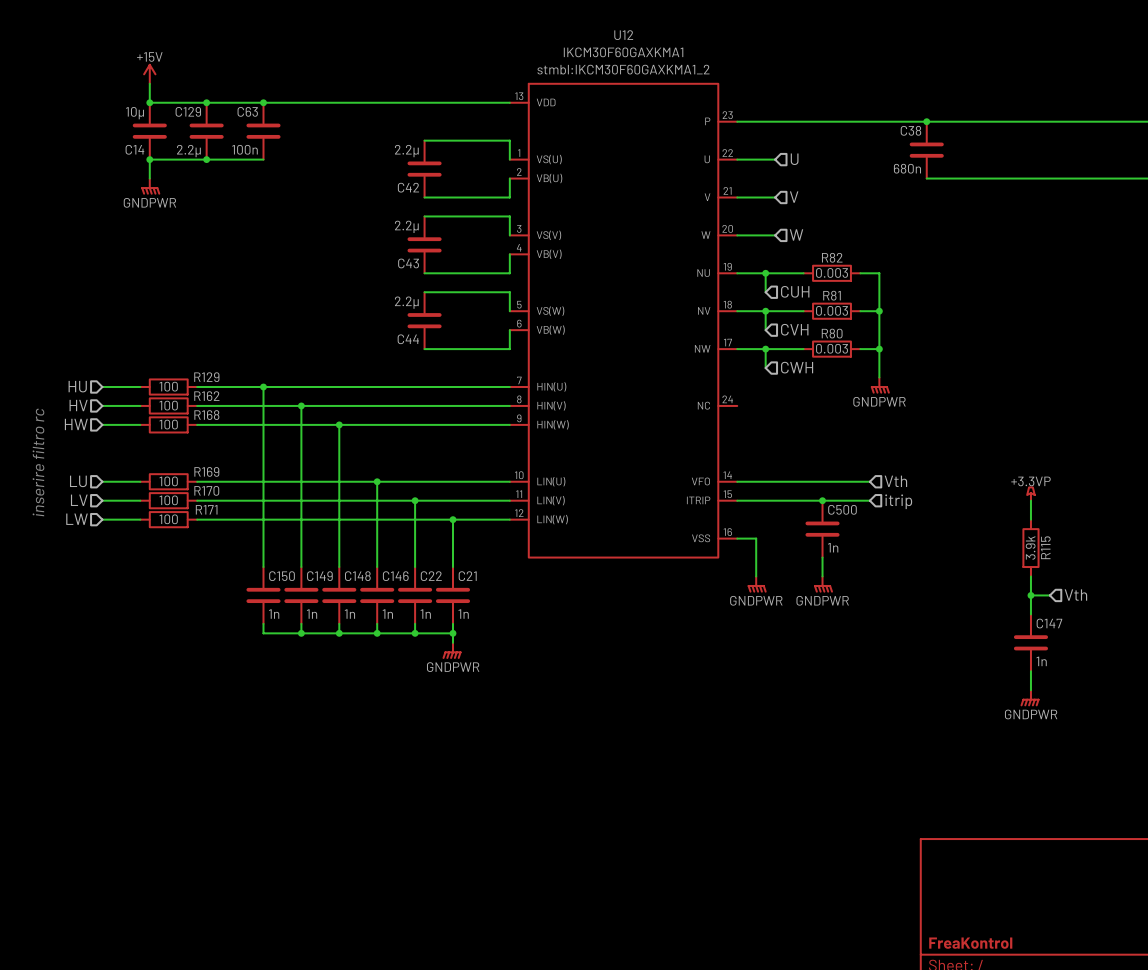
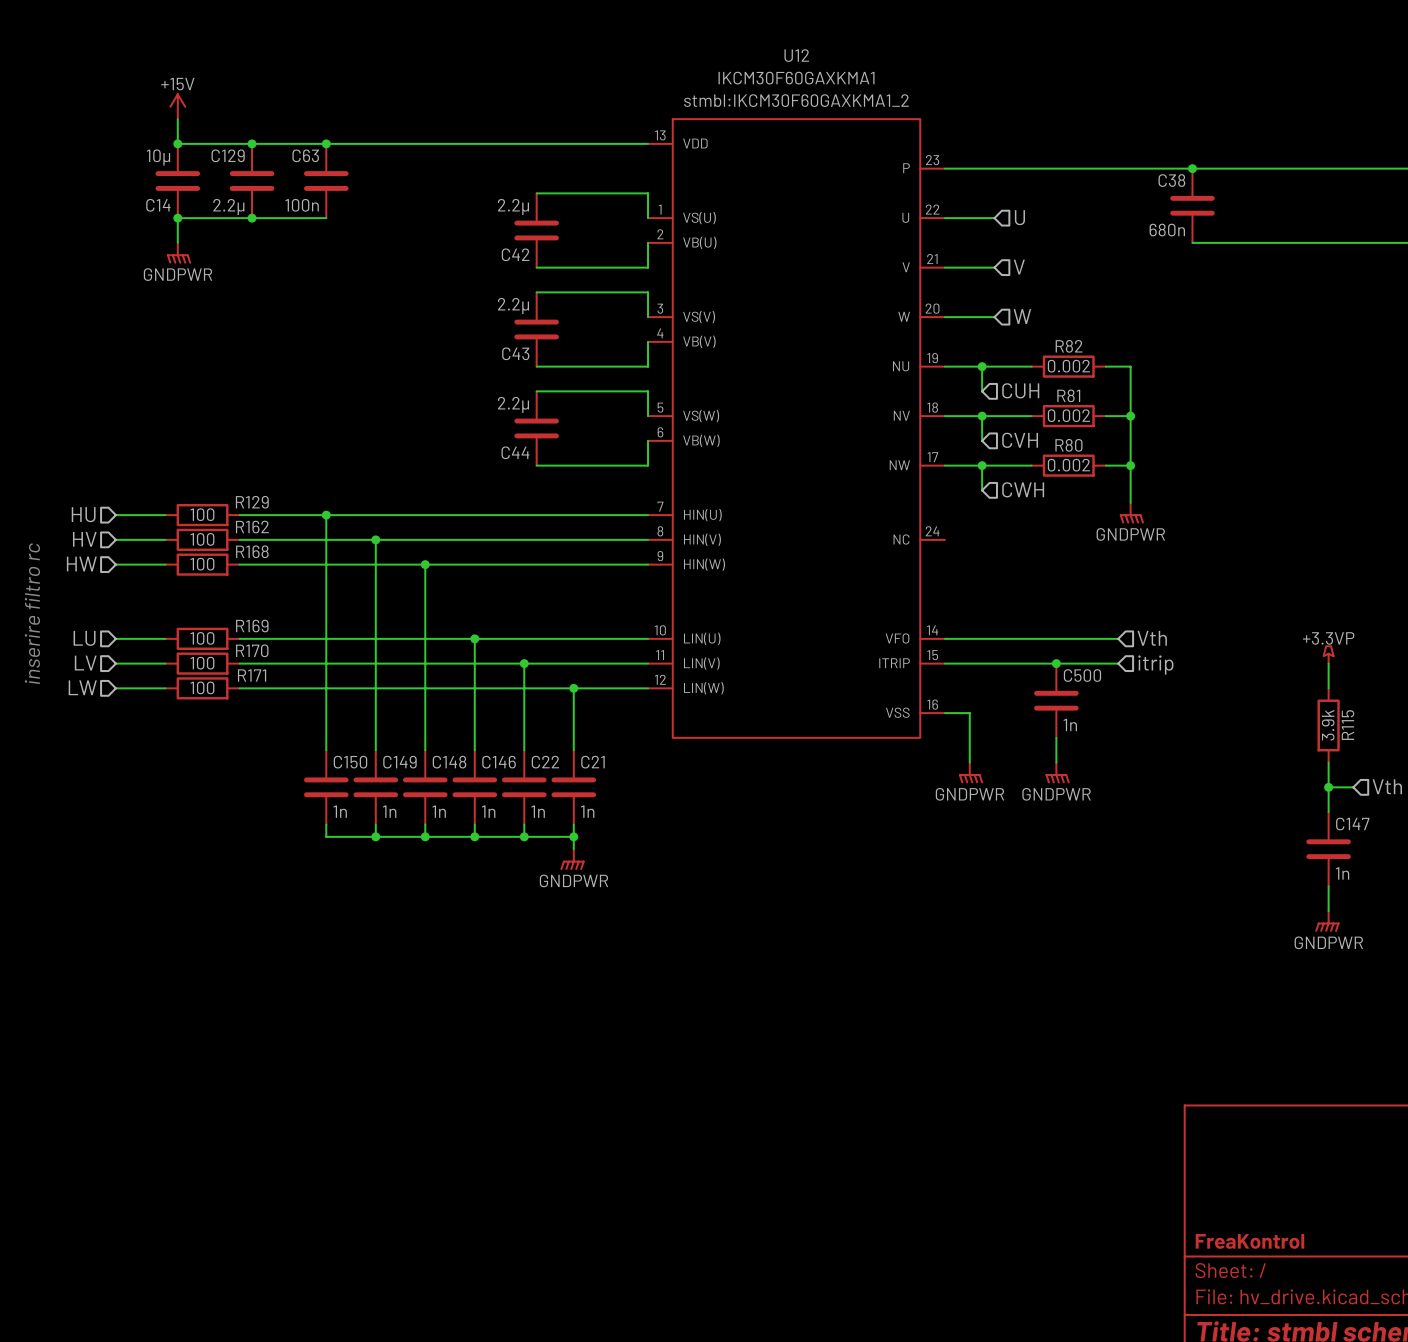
R82 value: 0.003 (832, 272) -> 0.002 (1068, 366)
R81 value: 0.003 (832, 310) -> 0.002 (1068, 415)
R80 value: 0.003 (832, 348) -> 0.002 (1068, 465)

